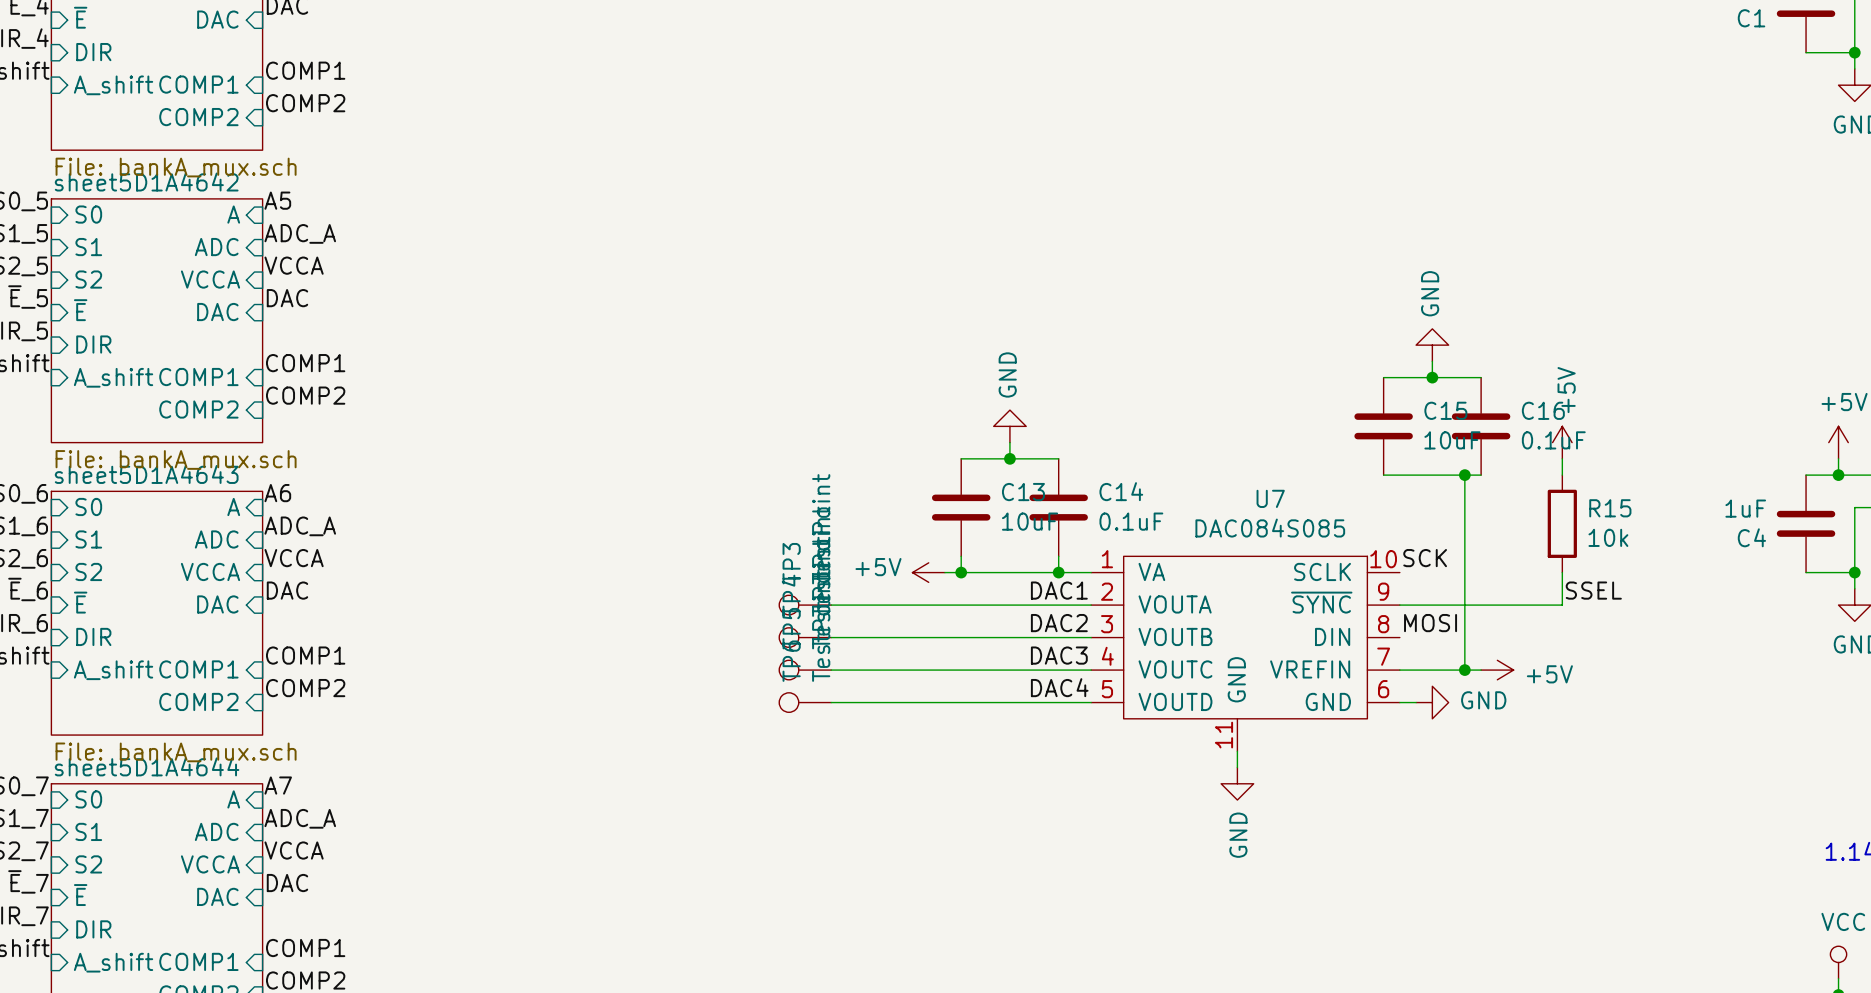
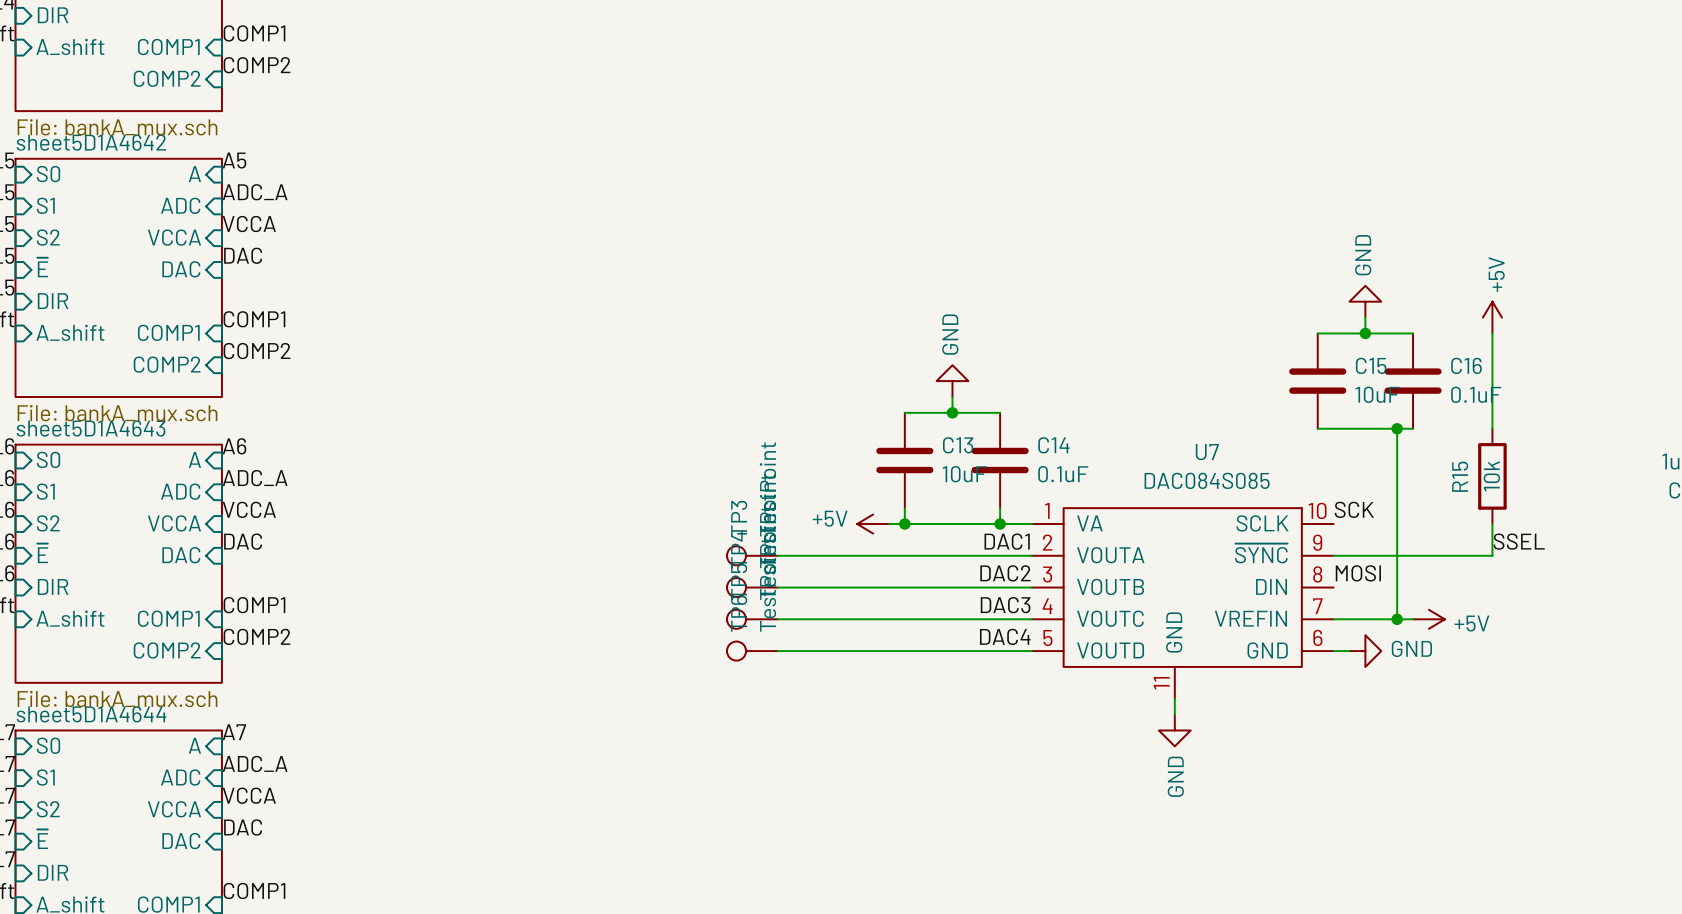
wire: none -> (1492, 333) (1492, 412)
power symbol position: +5V (1562, 442) -> +5V (1492, 317)
R15 name rotation: 0° (1610, 508) -> 90° counterclockwise (1460, 476)
R15 name position: R15 (1610, 508) -> R15 (1460, 476)
R15 value rotation: 0° (1608, 537) -> 90° counterclockwise (1491, 476)

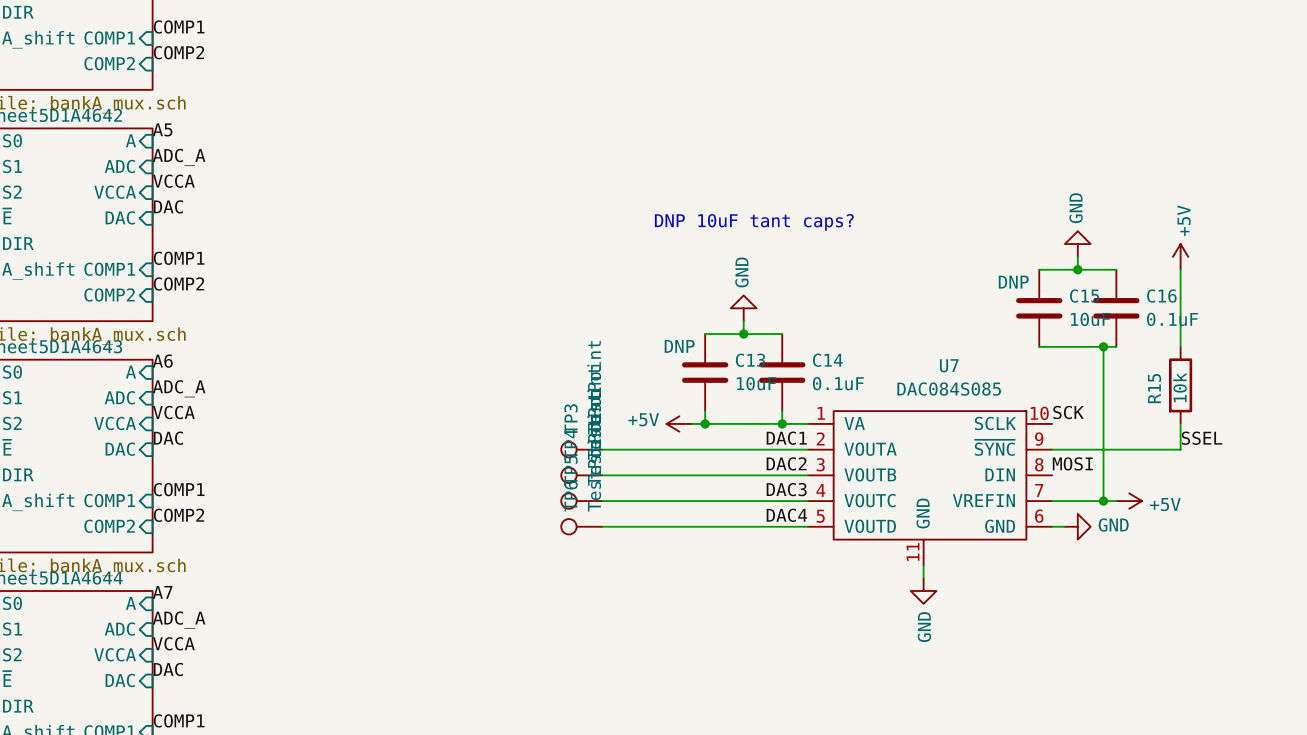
text: none -> DNP 10uF tant caps? (754, 222)
C15 text: none -> DNP (1013, 282)
C13 text: none -> DNP (679, 346)

